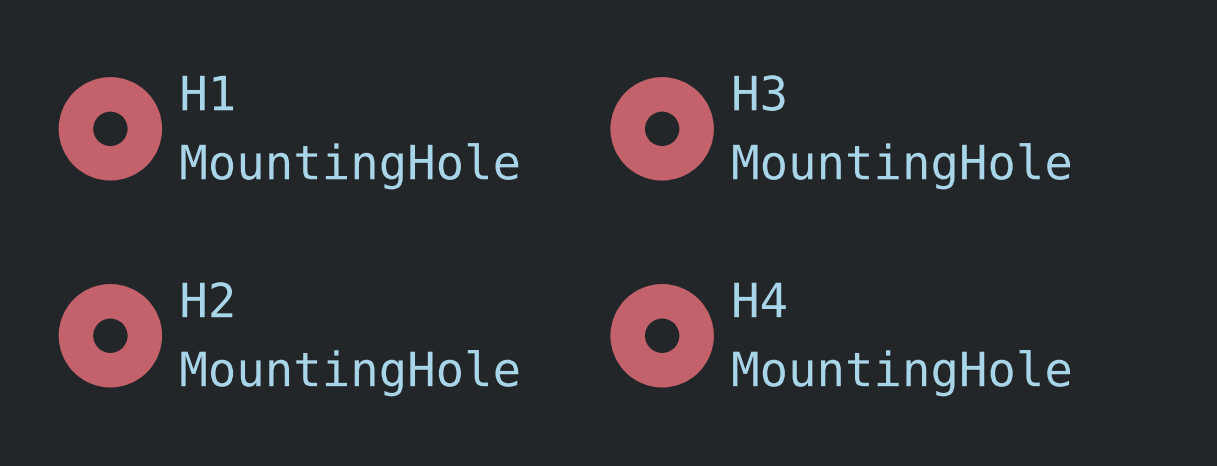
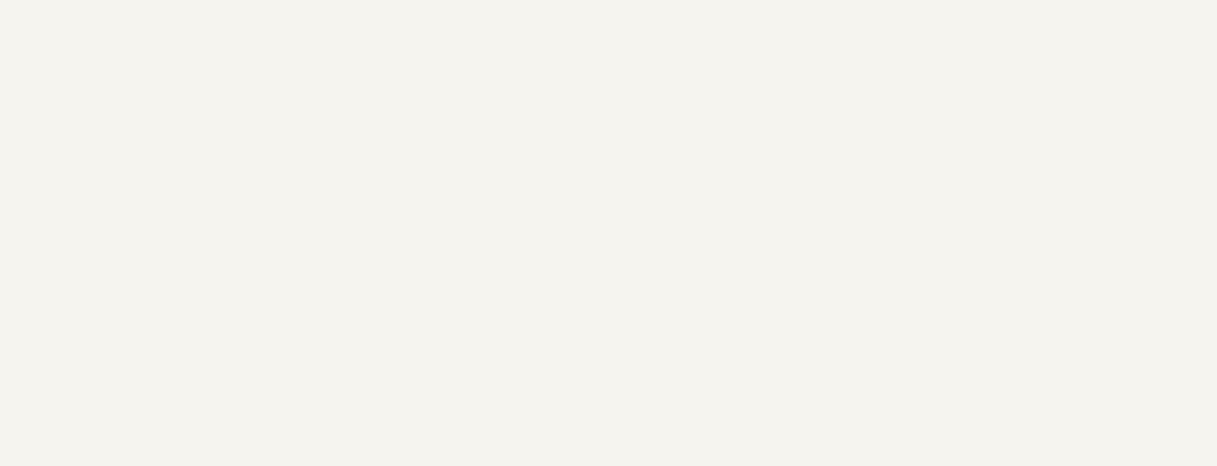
H1: MountingHole (110, 128) -> none
H3: MountingHole (662, 128) -> none
H2: MountingHole (110, 335) -> none
H4: MountingHole (662, 335) -> none

